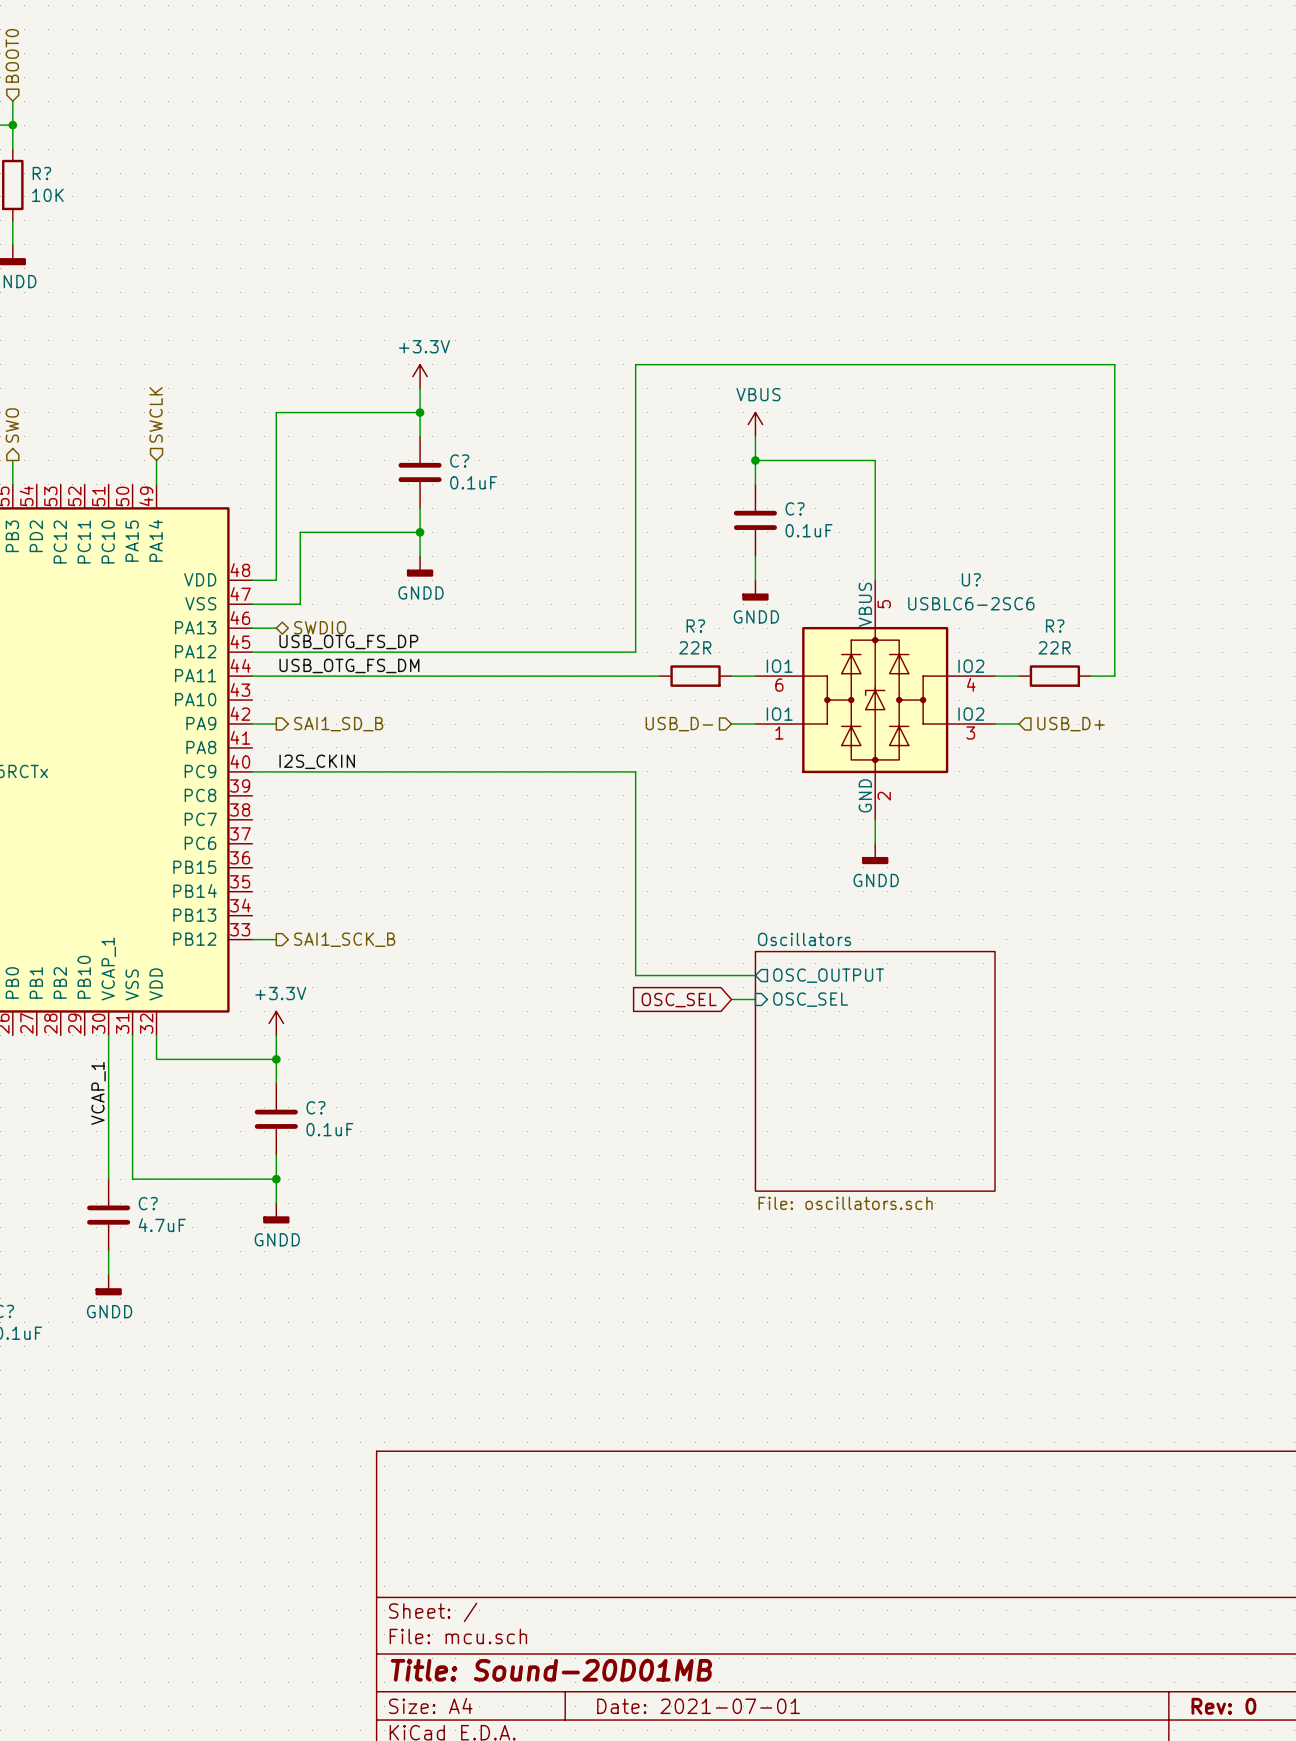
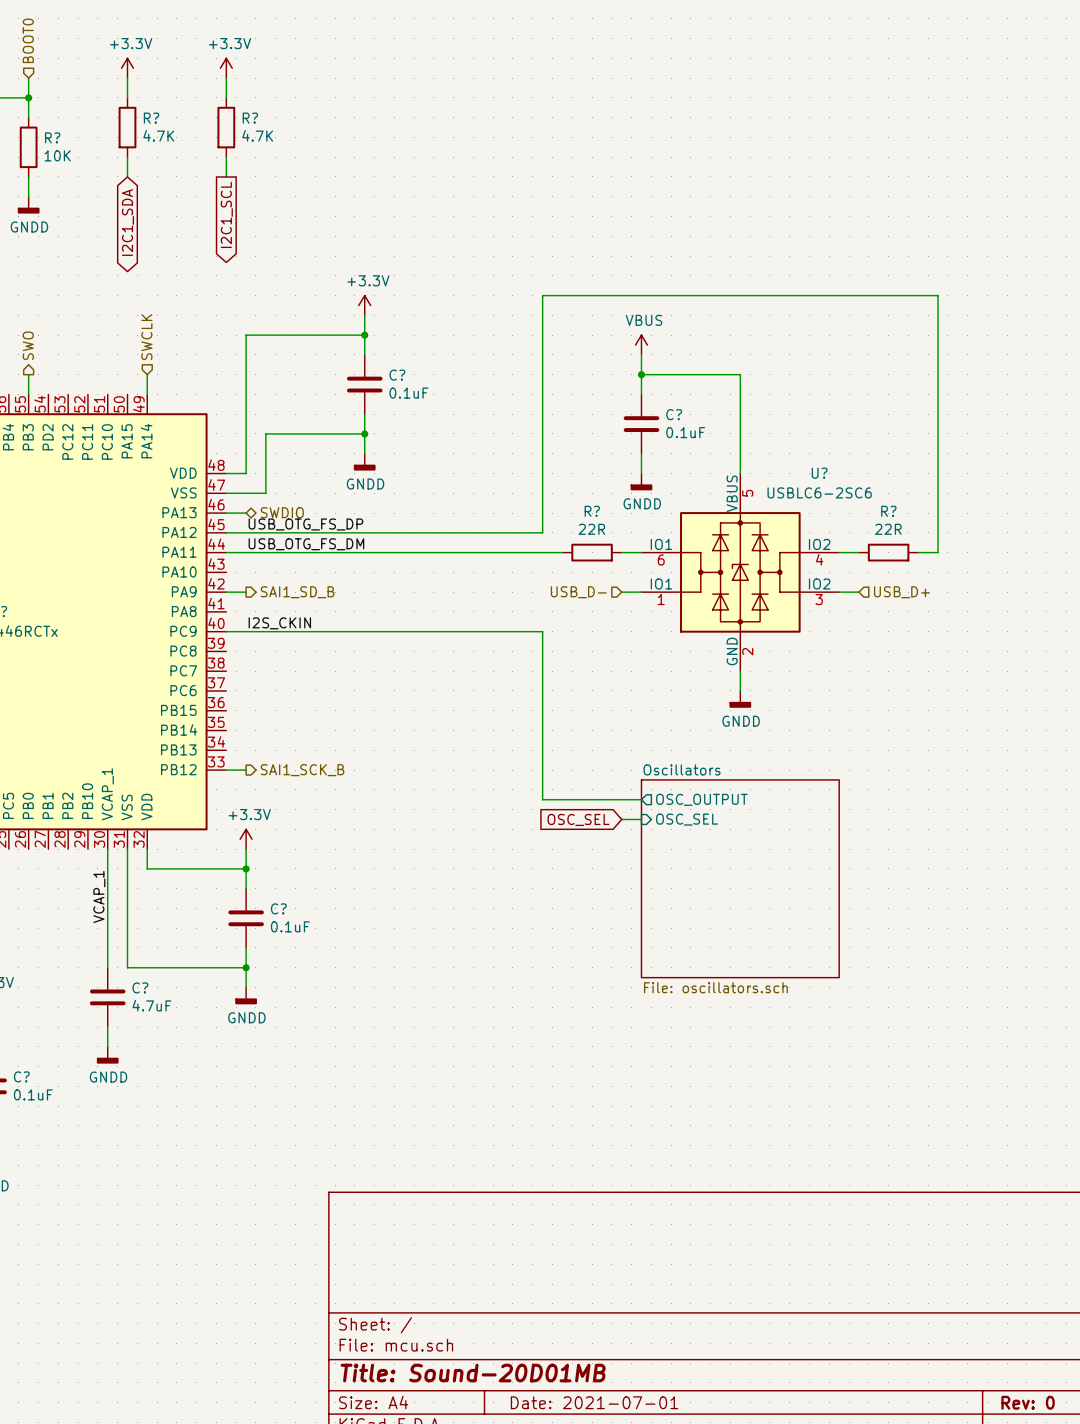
power symbol: none -> +3.3V (127, 68)
power symbol: none -> +3.3V (226, 68)
wire: none -> (127, 78) (127, 97)
wire: none -> (226, 78) (226, 97)
R?: none -> 4.7K (127, 127)
R?: none -> 4.7K (226, 127)
wire: none -> (127, 157) (127, 176)
wire: none -> (226, 157) (226, 176)
global label: none -> I2C1_SCL (226, 214)
global label: none -> I2C1_SDA (127, 222)

